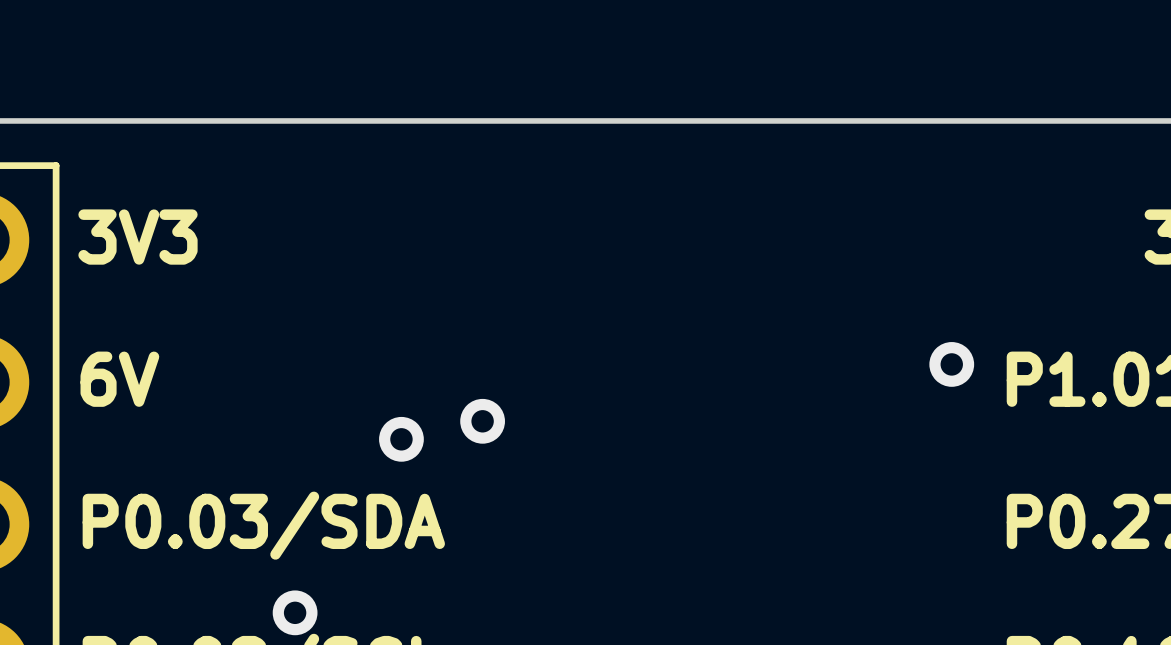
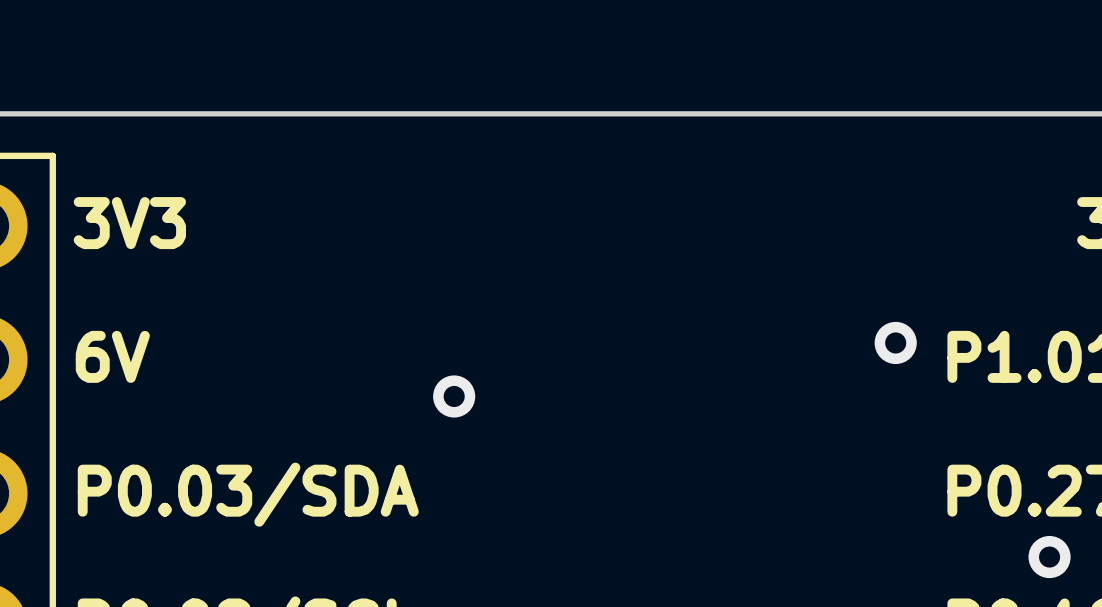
via: (401, 439) -> none
via: none -> (1049, 557)
via: (295, 612) -> none

